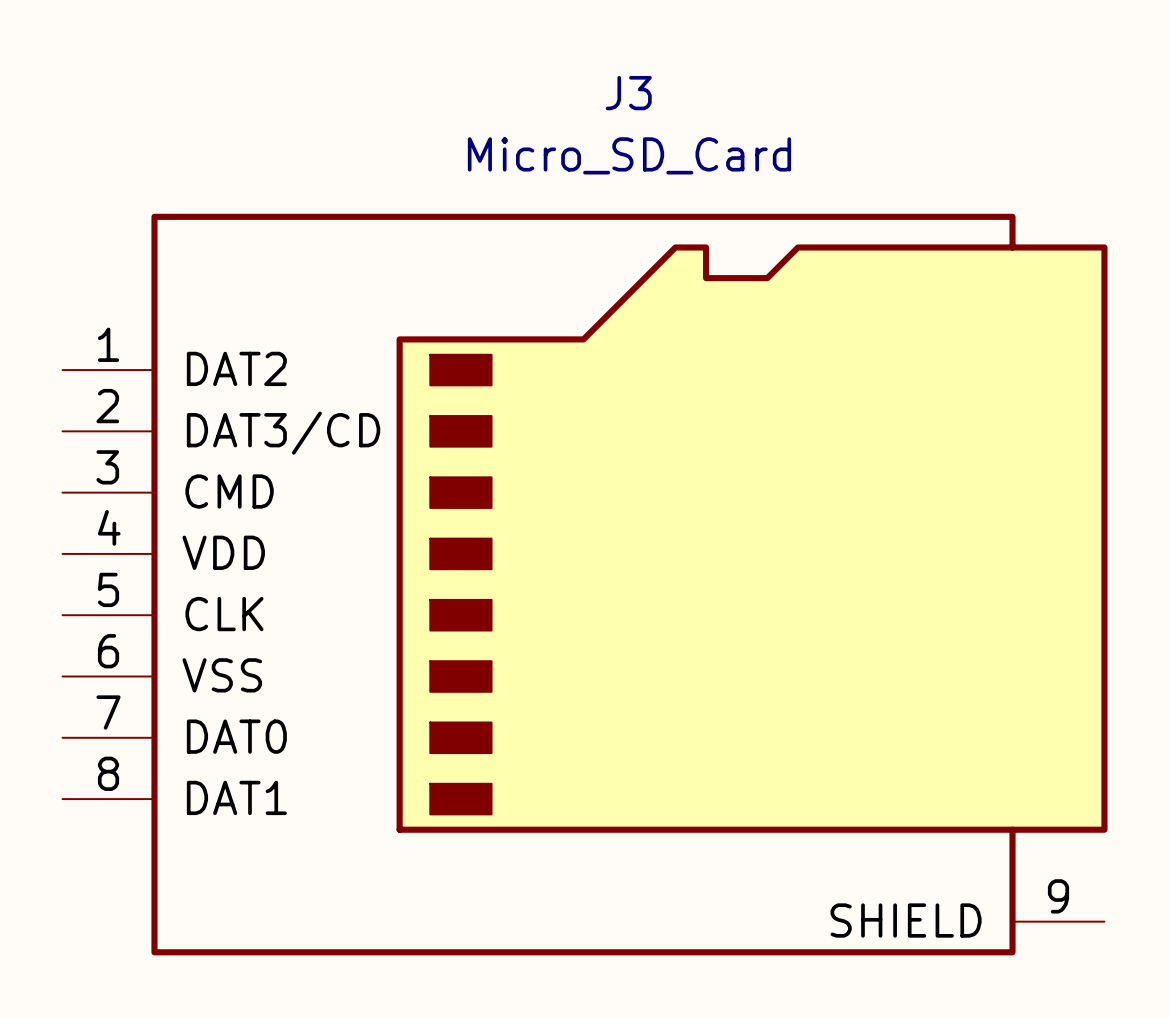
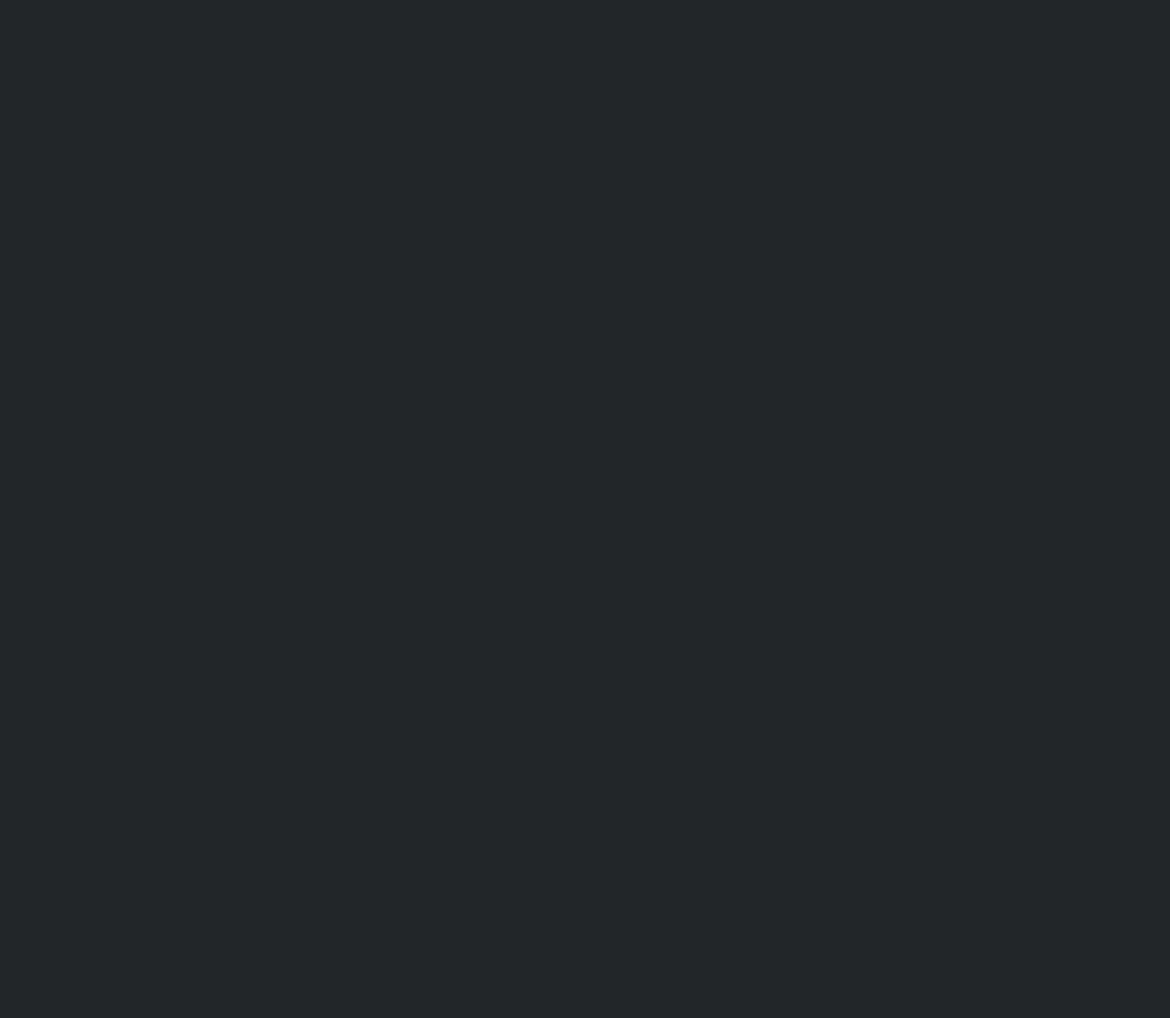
J3: Micro_SD_Card (585, 584) -> none

